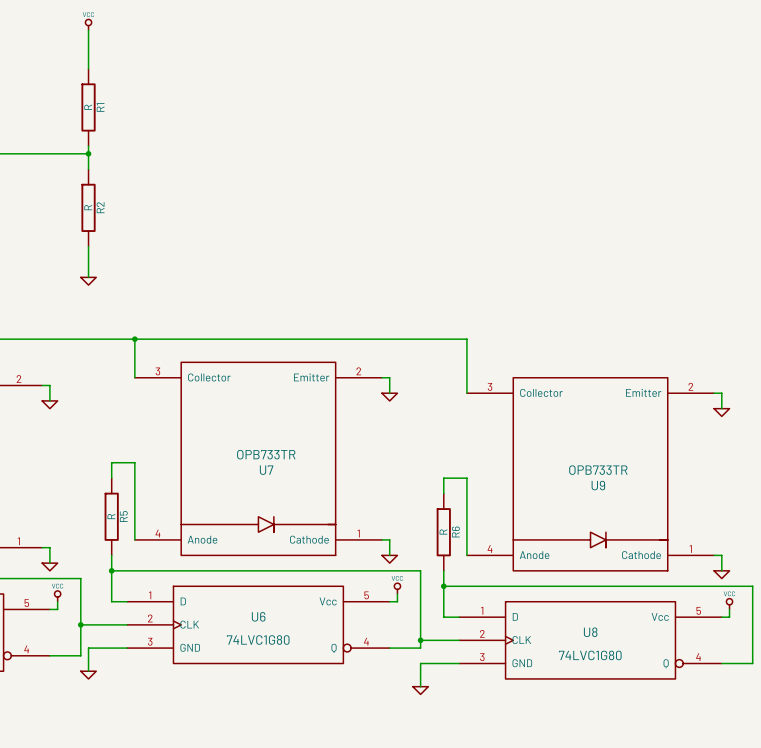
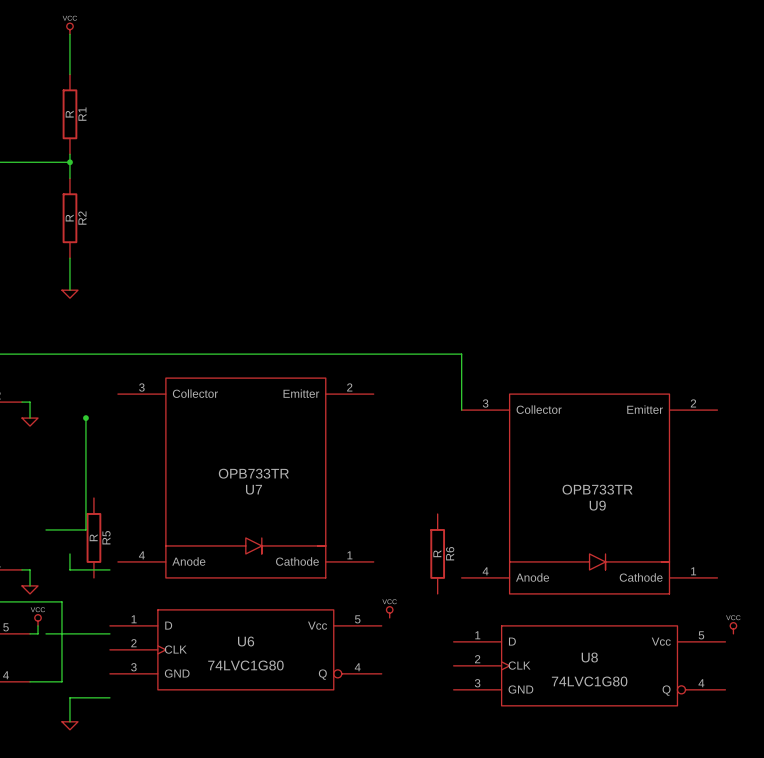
wire: (134, 339) (134, 377) -> none
junction: (134, 339) -> none
wire: (381, 377) (389, 377) (389, 393) -> none
wire: (714, 393) (721, 393) (721, 408) -> none
power symbol: (389, 397) -> none
wire: none -> (85, 418) (85, 529) (46, 529)
junction: none -> (85, 418)
power symbol: (721, 412) -> none
wire: (111, 478) (111, 462) (134, 462) (134, 539) -> none
wire: (443, 493) (443, 478) (466, 478) (466, 555) -> none
wire: none -> (69, 553) (69, 569) (109, 569)
wire: (381, 539) (389, 539) (389, 555) -> none
wire: (111, 555) (111, 601) (127, 601) -> none
wire: (714, 555) (721, 555) (721, 570) -> none
power symbol: (389, 559) -> none
wire: (111, 570) (420, 570) (420, 648) (389, 648) -> none
junction: (111, 570) -> none
wire: (443, 570) (443, 617) (459, 617) -> none
power symbol: (721, 574) -> none
wire: (443, 586) (752, 586) (752, 663) (721, 663) -> none
junction: (443, 586) -> none
wire: (397, 594) (397, 601) (389, 601) -> none
wire: none -> (46, 633) (109, 633)
wire: (729, 609) (729, 617) (721, 617) -> none
wire: (80, 624) (127, 624) -> none
junction: (80, 624) -> none
wire: (420, 640) (459, 640) -> none
junction: (420, 640) -> none
wire: (127, 648) (88, 648) (88, 671) -> (109, 697) (69, 697) (69, 721)
wire: (459, 663) (420, 663) (420, 686) -> none
power symbol position: (88, 675) -> (69, 725)
power symbol: (420, 690) -> none

